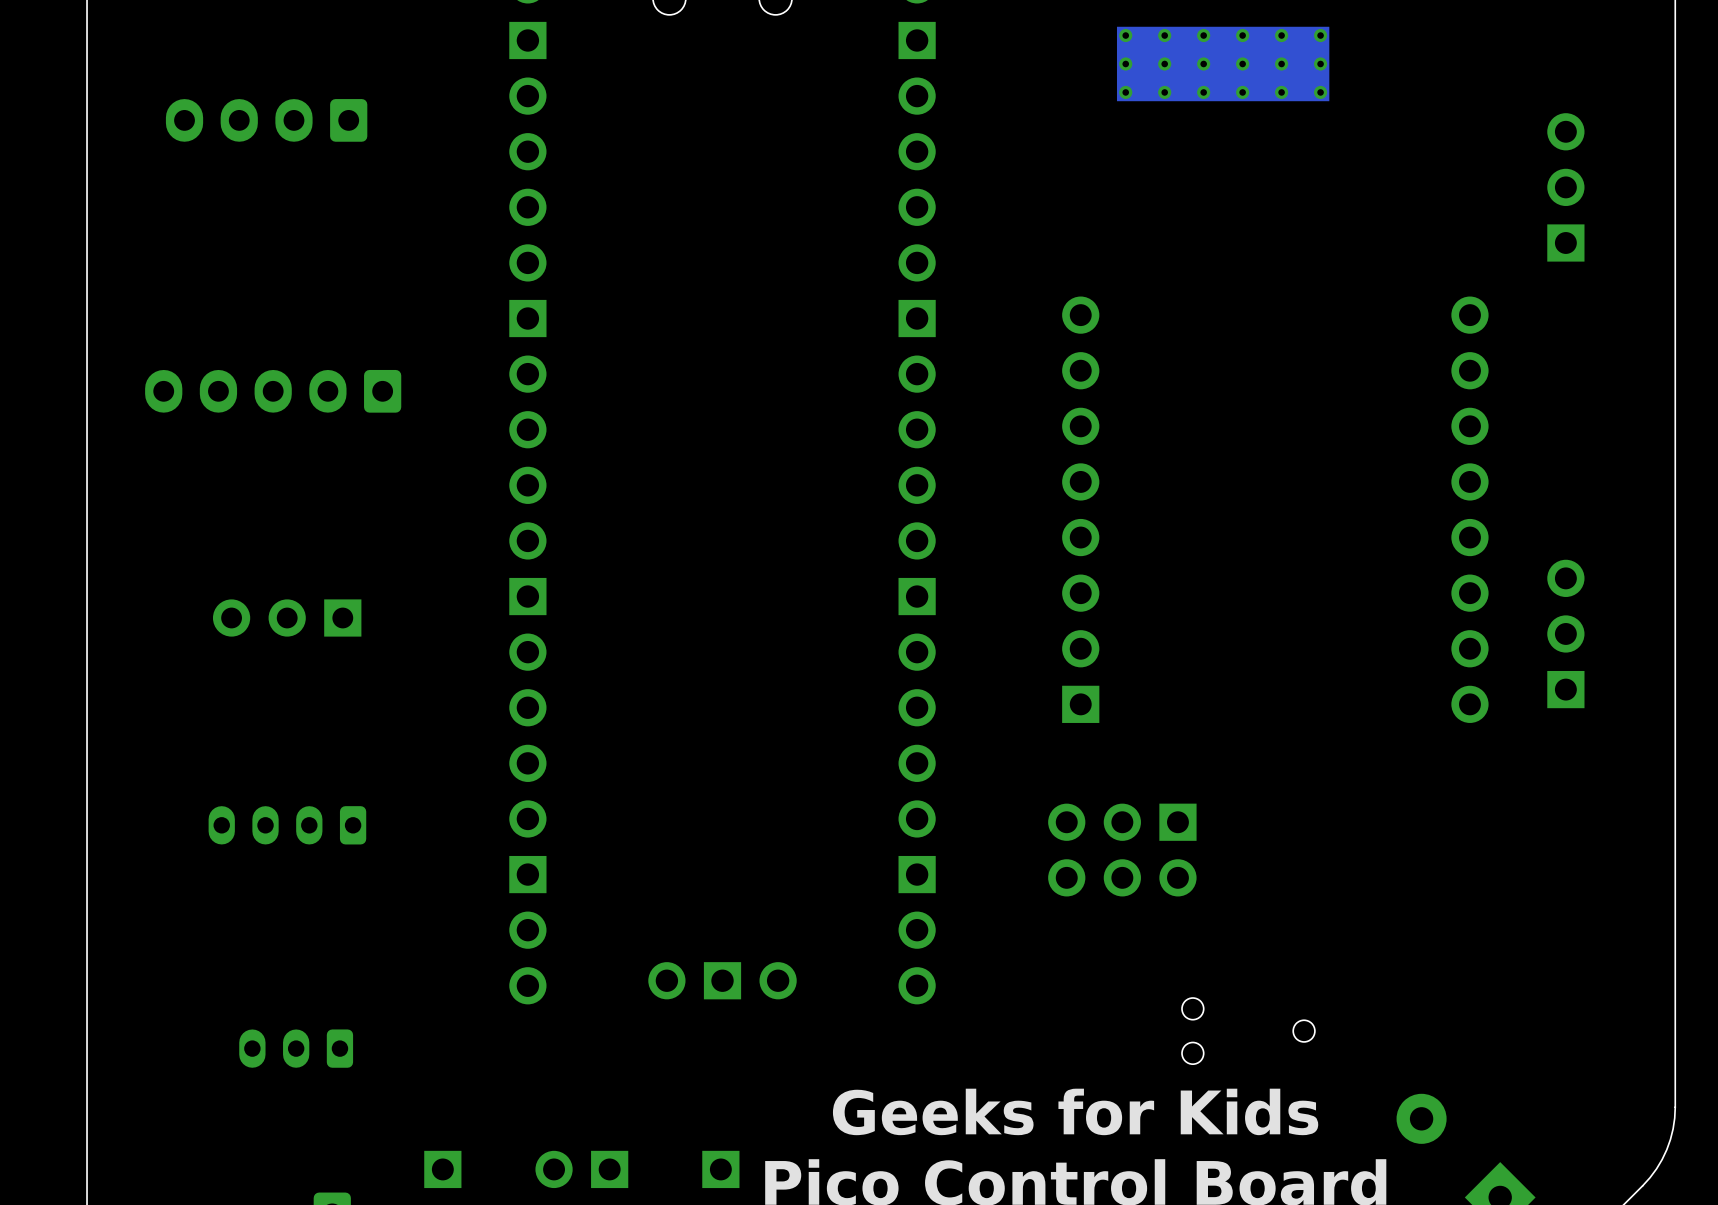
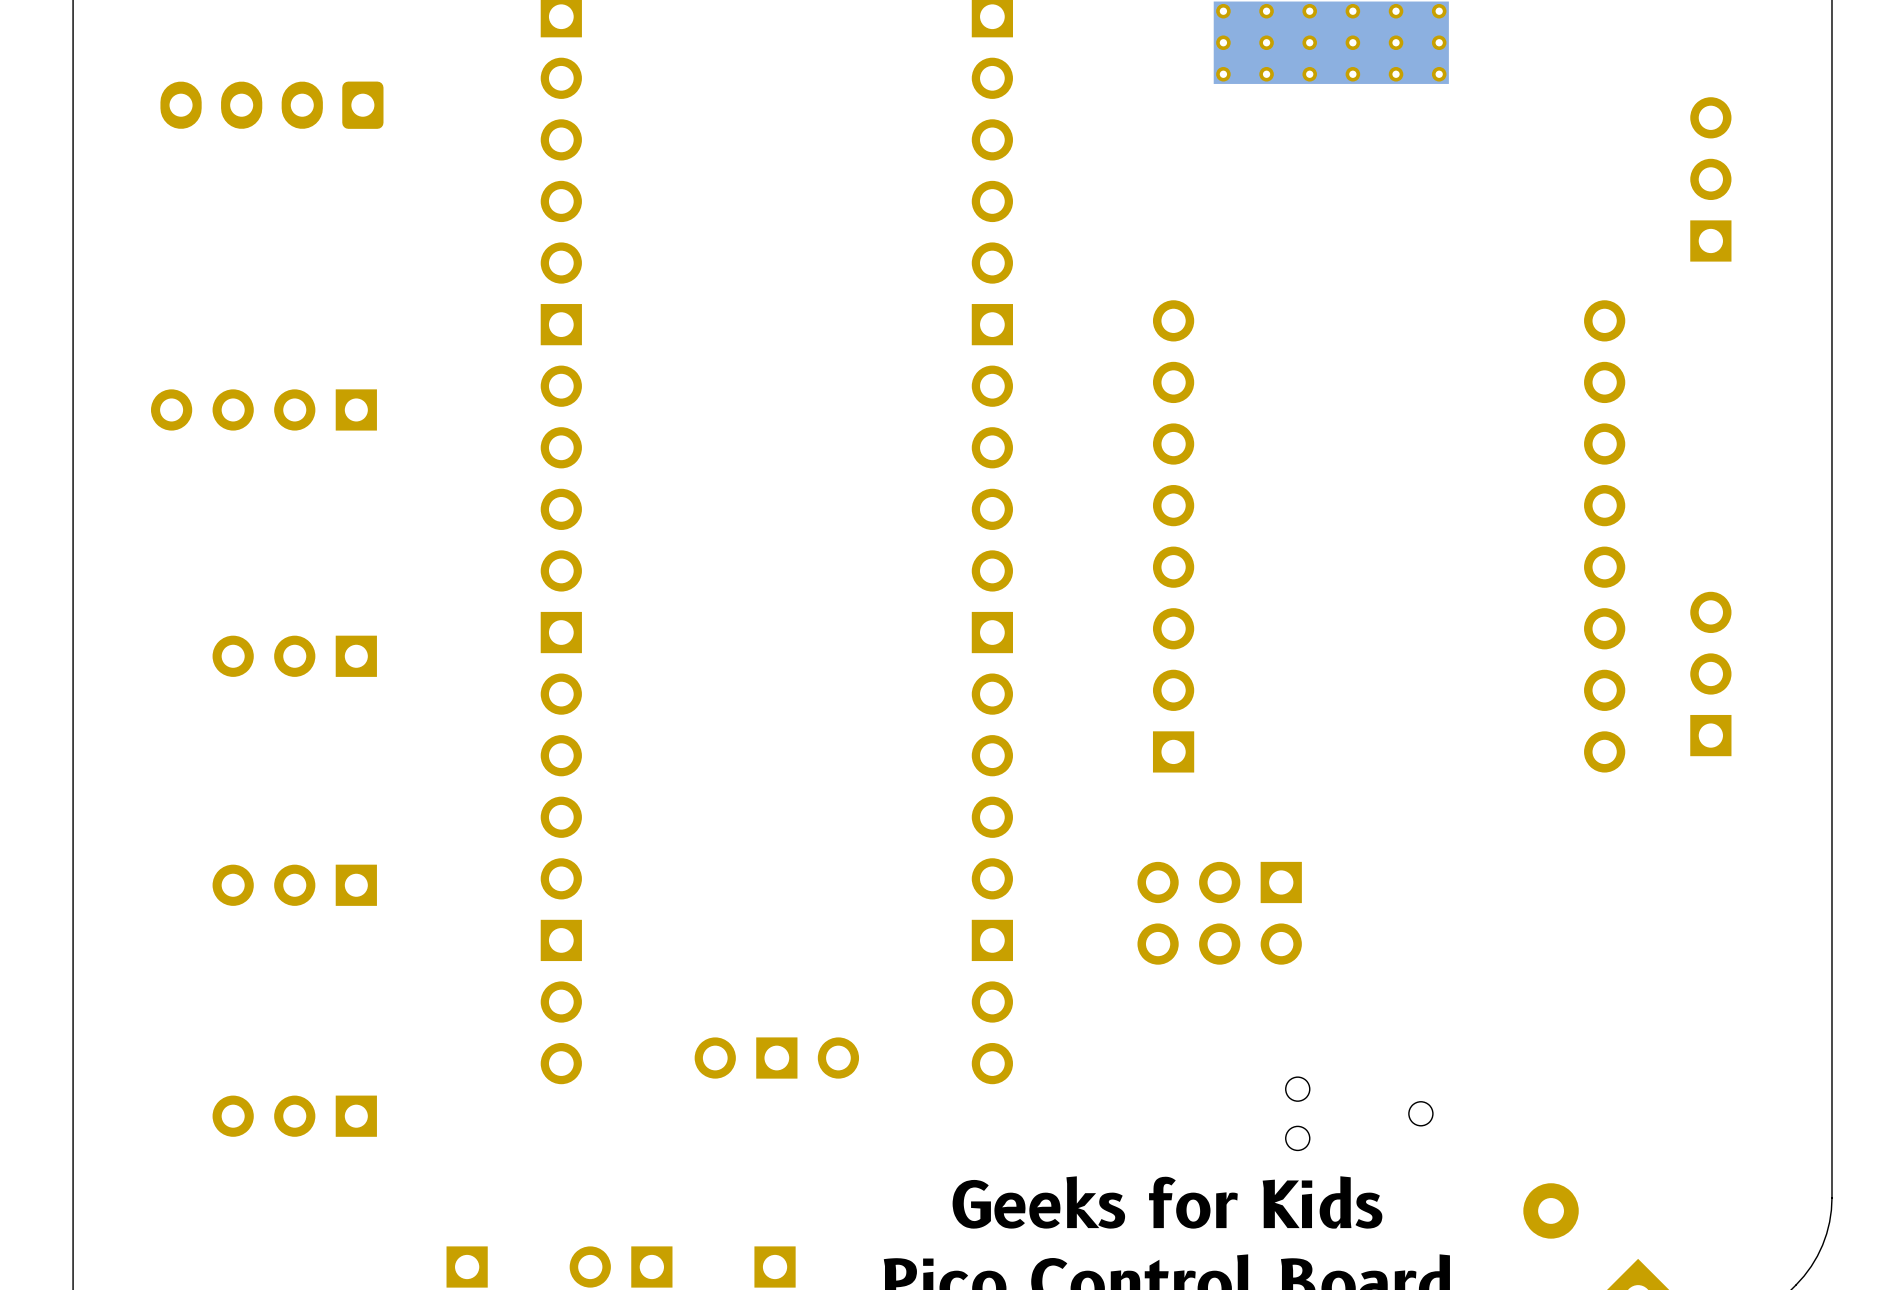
part footprint: [145, 369, 402, 413] -> [150, 389, 377, 431]
part footprint: [208, 806, 367, 845] -> [212, 864, 377, 906]
part footprint: [239, 1029, 354, 1068] -> [212, 1095, 377, 1137]

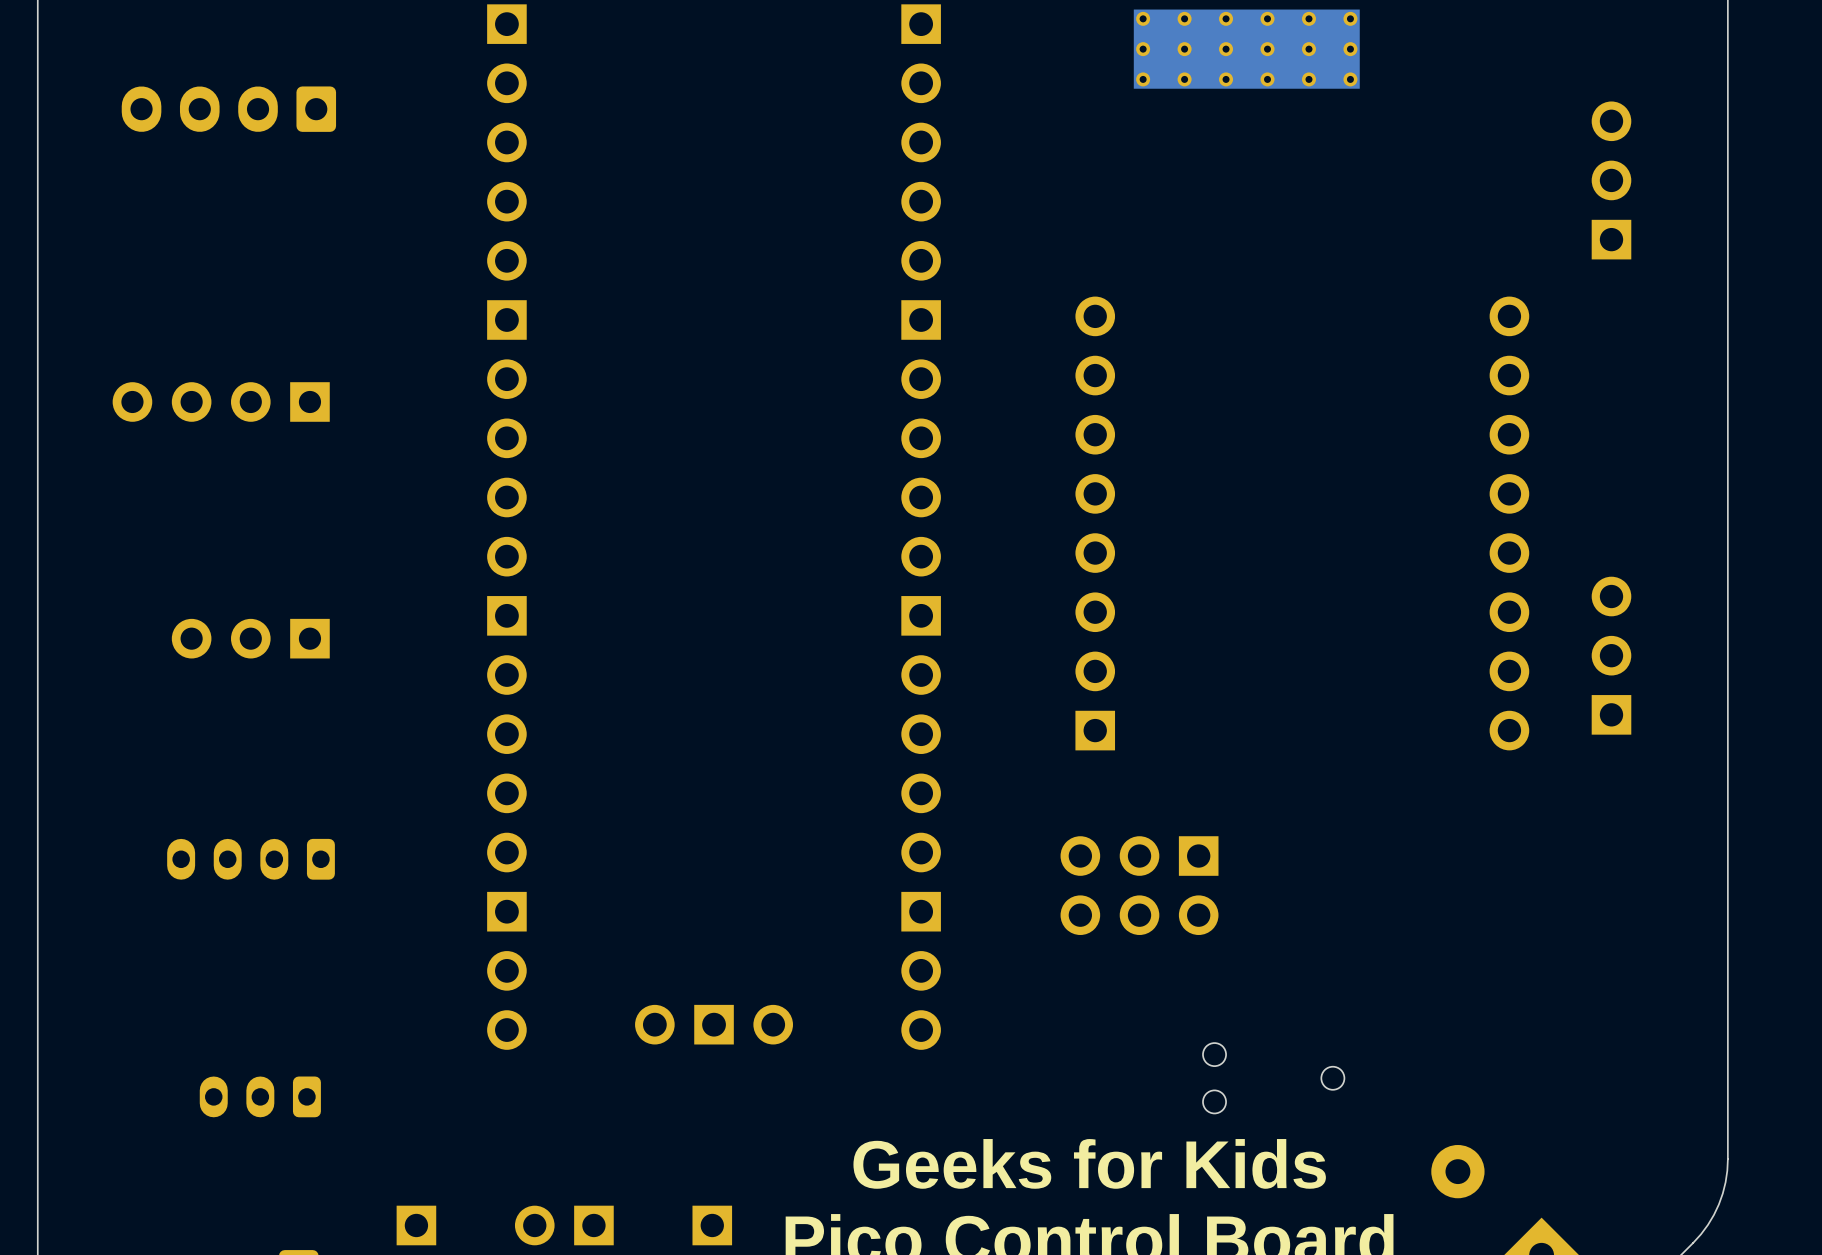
part footprint: [212, 864, 377, 906] -> [167, 838, 335, 880]
part footprint: [212, 1095, 377, 1137] -> [199, 1076, 321, 1118]

